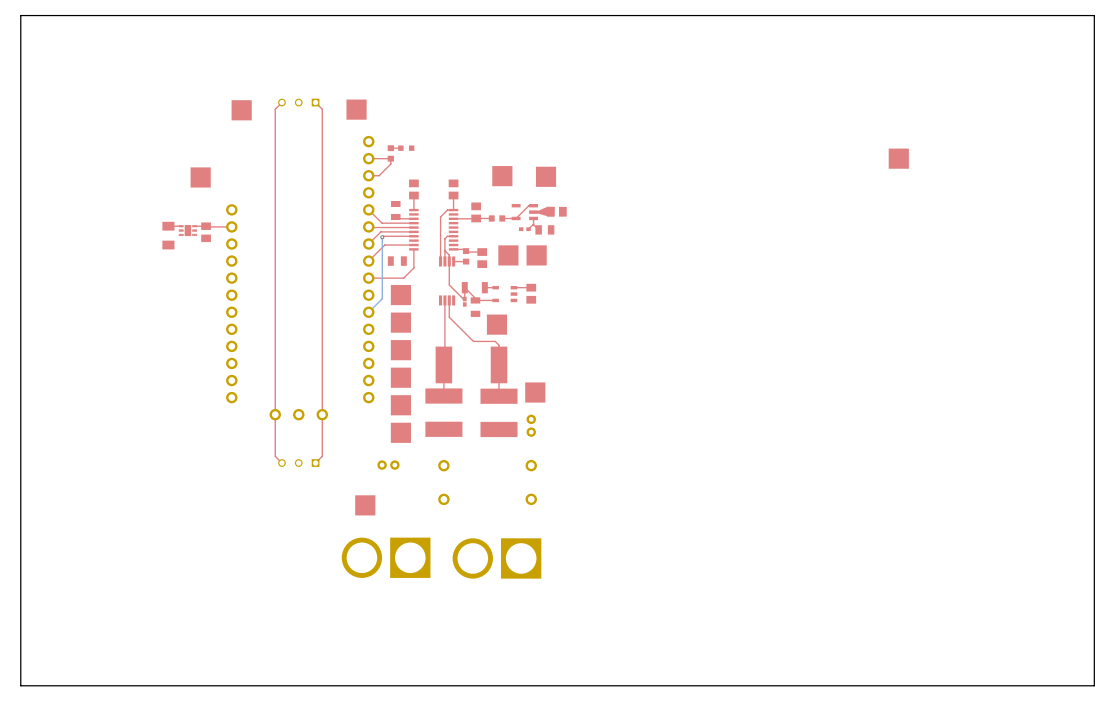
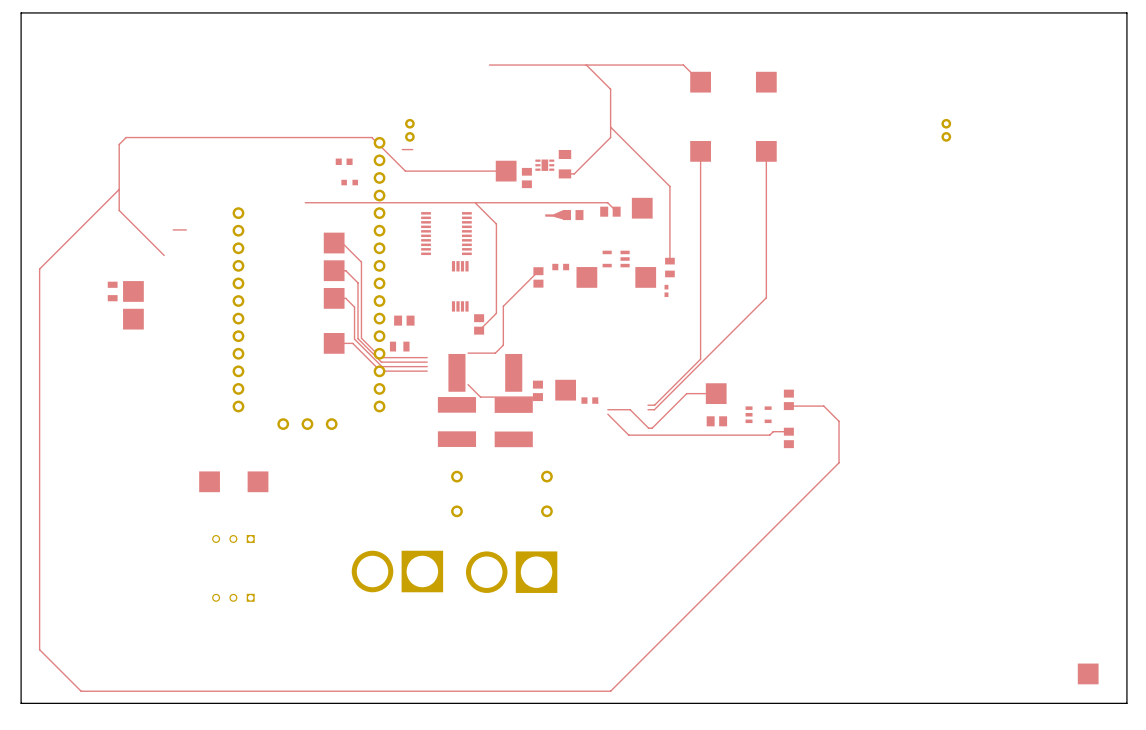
top track: none -> (489, 65) (683, 65) (700, 82)
top track: none -> (586, 65) (610, 89) (610, 137) (574, 173) (564, 173)
part: none -> (700, 82)
part: none -> (766, 82)
top track: (281, 102) (275, 109) (275, 456) (281, 463) -> none
part: (298, 102) -> none
top track: (315, 102) (322, 109) (322, 456) (315, 463) -> none
part: (356, 109) -> none
part: (241, 110) -> none
top track: none -> (610, 127) (669, 186) (669, 261)
part: none -> (409, 130)
part: none -> (946, 130)
part position: (406, 148) -> (349, 182)
top track: none -> (700, 151) (700, 359) (654, 405) (647, 405)
part: none -> (700, 151)
top track: none -> (766, 151) (766, 297) (654, 409) (647, 409)
part: none -> (766, 151)
part rotation: 0° (390, 153) -> 90° clockwise (344, 161)
part position: (390, 153) -> (344, 161)
top track: (368, 158) (390, 158) (390, 164) (379, 175) (368, 175) -> none
part: (898, 158) -> none
part: none -> (564, 164)
part: none -> (544, 165)
top track: none -> (506, 171) (405, 171) (371, 137) (126, 137) (119, 144) (119, 210) (164, 255)
part: none -> (526, 178)
part position: (502, 176) -> (506, 171)
part: (546, 176) -> none
part: (200, 177) -> none
top track: none -> (119, 189) (39, 269) (39, 649) (81, 691) (610, 691) (839, 462) (839, 421) (823, 406) (788, 406)
part: (413, 189) -> none
part: (453, 189) -> none
top track: (413, 195) (413, 210) -> none
top track: (453, 195) (453, 210) (447, 210) (440, 217) (440, 261) -> none
top track: none -> (305, 202) (607, 202) (616, 211)
top track: none -> (475, 202) (496, 224) (496, 313) (479, 330)
top track: (533, 205) (528, 205) (516, 218) (502, 218) -> none
part: none -> (642, 208)
part: none -> (610, 211)
top track: (368, 209) (382, 223) (413, 223) -> none
part: (395, 210) -> none
part: (476, 212) -> none
part position: (524, 212) -> (616, 259)
top track: (395, 217) (397, 218) (413, 218) -> none
top track: (491, 218) (453, 218) -> none
part: (496, 218) -> none
top track: (533, 218) (533, 224) (538, 229) -> none
top track: (533, 224) (528, 229) -> none
top track: (194, 226) (231, 226) -> none
top track: (368, 226) (413, 227) -> none
part rotation: 0° (524, 229) -> 90° clockwise (666, 290)
part position: (524, 229) -> (666, 290)
part rotation: 0° (544, 229) -> 90° clockwise (669, 267)
part position: (544, 229) -> (669, 267)
part: (187, 230) -> none
top track: (413, 231) (380, 231) (368, 244) -> none
part: (206, 232) -> none
part: (168, 235) -> none
top track: (413, 236) (382, 237) -> none
top track: (453, 236) (447, 236) (444, 238) (444, 261) -> none
bottom track: (382, 237) (382, 298) (368, 312) -> none
via: (382, 237) -> none
top track: none -> (334, 243) (342, 243) (361, 262) (361, 338) (380, 357) (427, 357)
part: none -> (334, 243)
top track: (413, 245) (384, 245) (368, 261) -> none
top track: (413, 249) (413, 267) (403, 278) (368, 278) -> none
top track: (453, 249) (482, 252) -> none
top track: (444, 250) (449, 255) (449, 284) (463, 299) (464, 287) (475, 300) -> none
part: (508, 255) -> none
part: (536, 255) -> none
part: (466, 256) -> none
part: (482, 258) -> none
part: (397, 261) -> none
top track: (453, 261) (466, 261) -> none
part: none -> (560, 267)
top track: none -> (334, 270) (345, 270) (357, 282) (357, 338) (381, 362) (427, 362)
part: none -> (334, 270)
top track: none -> (538, 271) (503, 306) (503, 345) (495, 353) (468, 353)
part: none -> (538, 277)
part: none -> (586, 277)
part: none -> (645, 277)
part: none -> (112, 291)
part: none -> (133, 291)
part: (474, 287) -> none
top track: (495, 287) (484, 287) -> none
top track: (531, 287) (513, 287) -> none
top track: none -> (334, 298) (345, 298) (354, 307) (354, 339) (382, 366) (427, 366)
part: none -> (334, 298)
part: (531, 293) -> none
part: (504, 294) -> none
part: (400, 295) -> none
top track: (444, 300) (443, 396) -> none
top track: (449, 300) (449, 317) (473, 341) (495, 341) (499, 345) (499, 396) -> none
top track: (495, 300) (475, 300) -> none
part: (464, 301) -> none
part: (475, 307) -> none
part: none -> (133, 319)
part: none -> (404, 320)
part: none -> (479, 324)
part: (400, 322) -> none
part: (496, 324) -> none
top track: none -> (334, 343) (352, 343) (380, 371) (427, 371)
part: none -> (334, 343)
part: none -> (399, 346)
part: (400, 350) -> none
top track: none -> (468, 384) (480, 397) (537, 397)
part: (400, 377) -> none
part: none -> (537, 390)
top track: none -> (716, 393) (686, 393) (652, 428) (648, 428) (630, 409) (607, 409)
part: none -> (716, 393)
part: none -> (589, 400)
part: none -> (788, 399)
part position: (535, 392) -> (565, 390)
part: (400, 405) -> none
top track: none -> (607, 414) (628, 435) (769, 435) (773, 431) (788, 431)
part: none -> (758, 414)
part: none -> (716, 421)
part: (531, 425) -> none
part: none -> (788, 437)
part: (400, 432) -> none
part: (298, 463) -> none
part: (388, 465) -> none
part: none -> (209, 481)
part: none -> (258, 481)
part: (365, 505) -> none
part: none -> (233, 538)
part: none -> (233, 597)
part: none -> (1088, 673)

